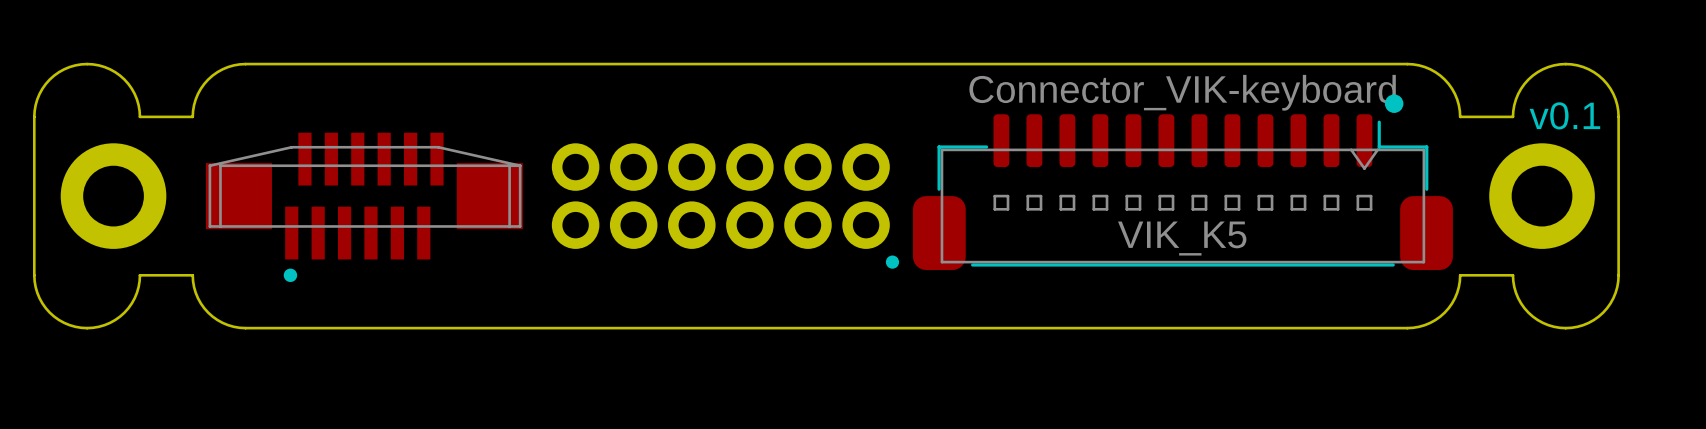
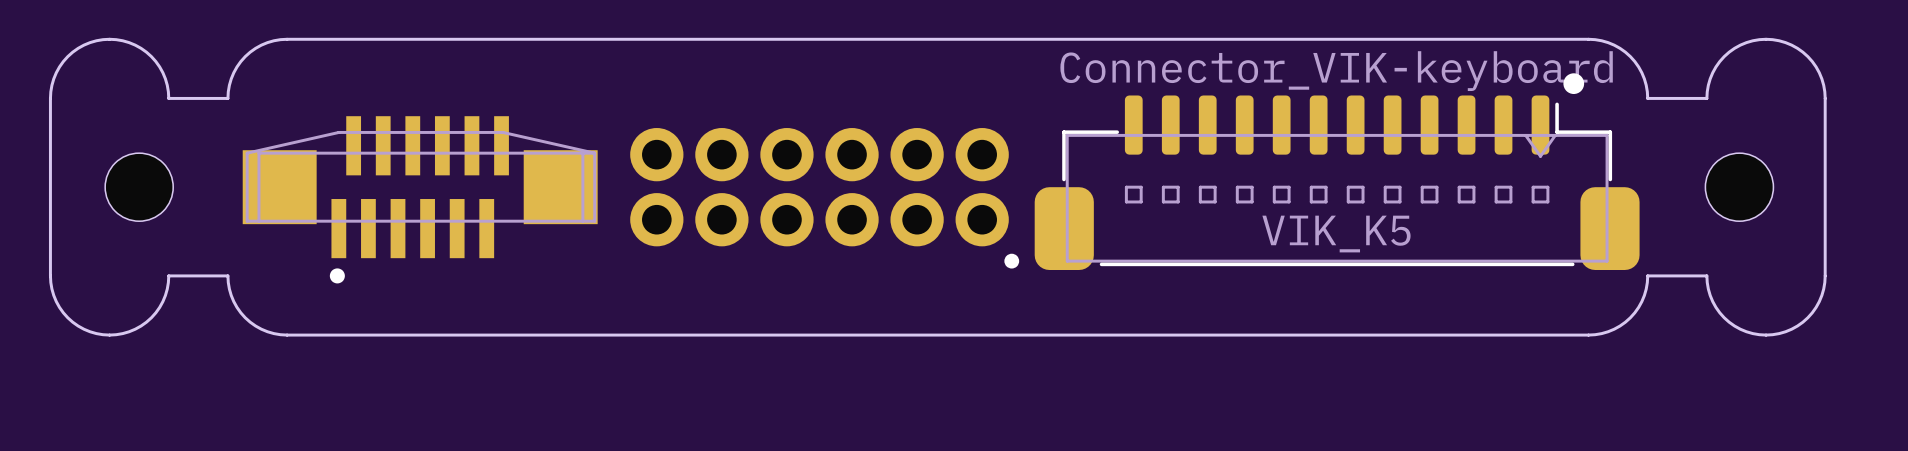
text: v0.1 (1564, 115) -> none
part footprint: [60, 143, 167, 249] -> [105, 153, 174, 222]
part footprint: [1489, 143, 1595, 249] -> [1705, 153, 1774, 222]

